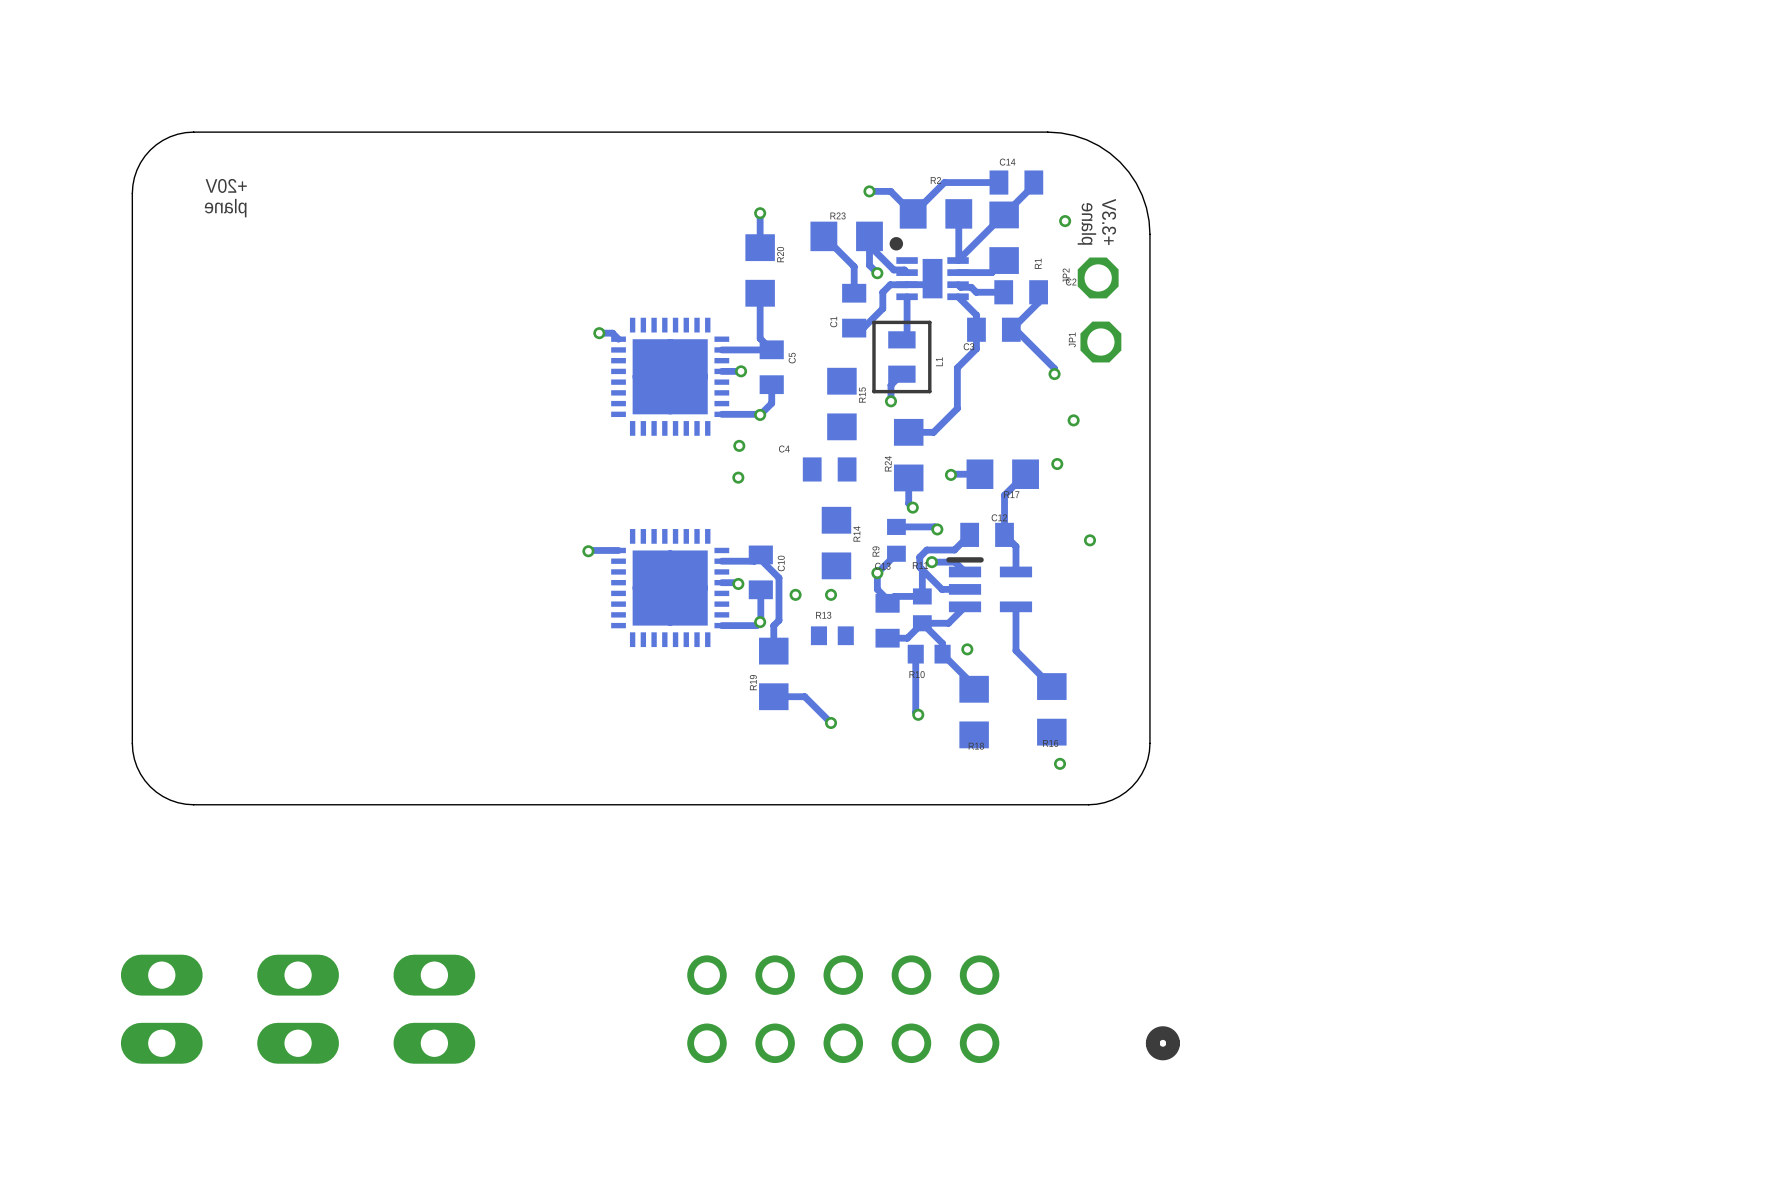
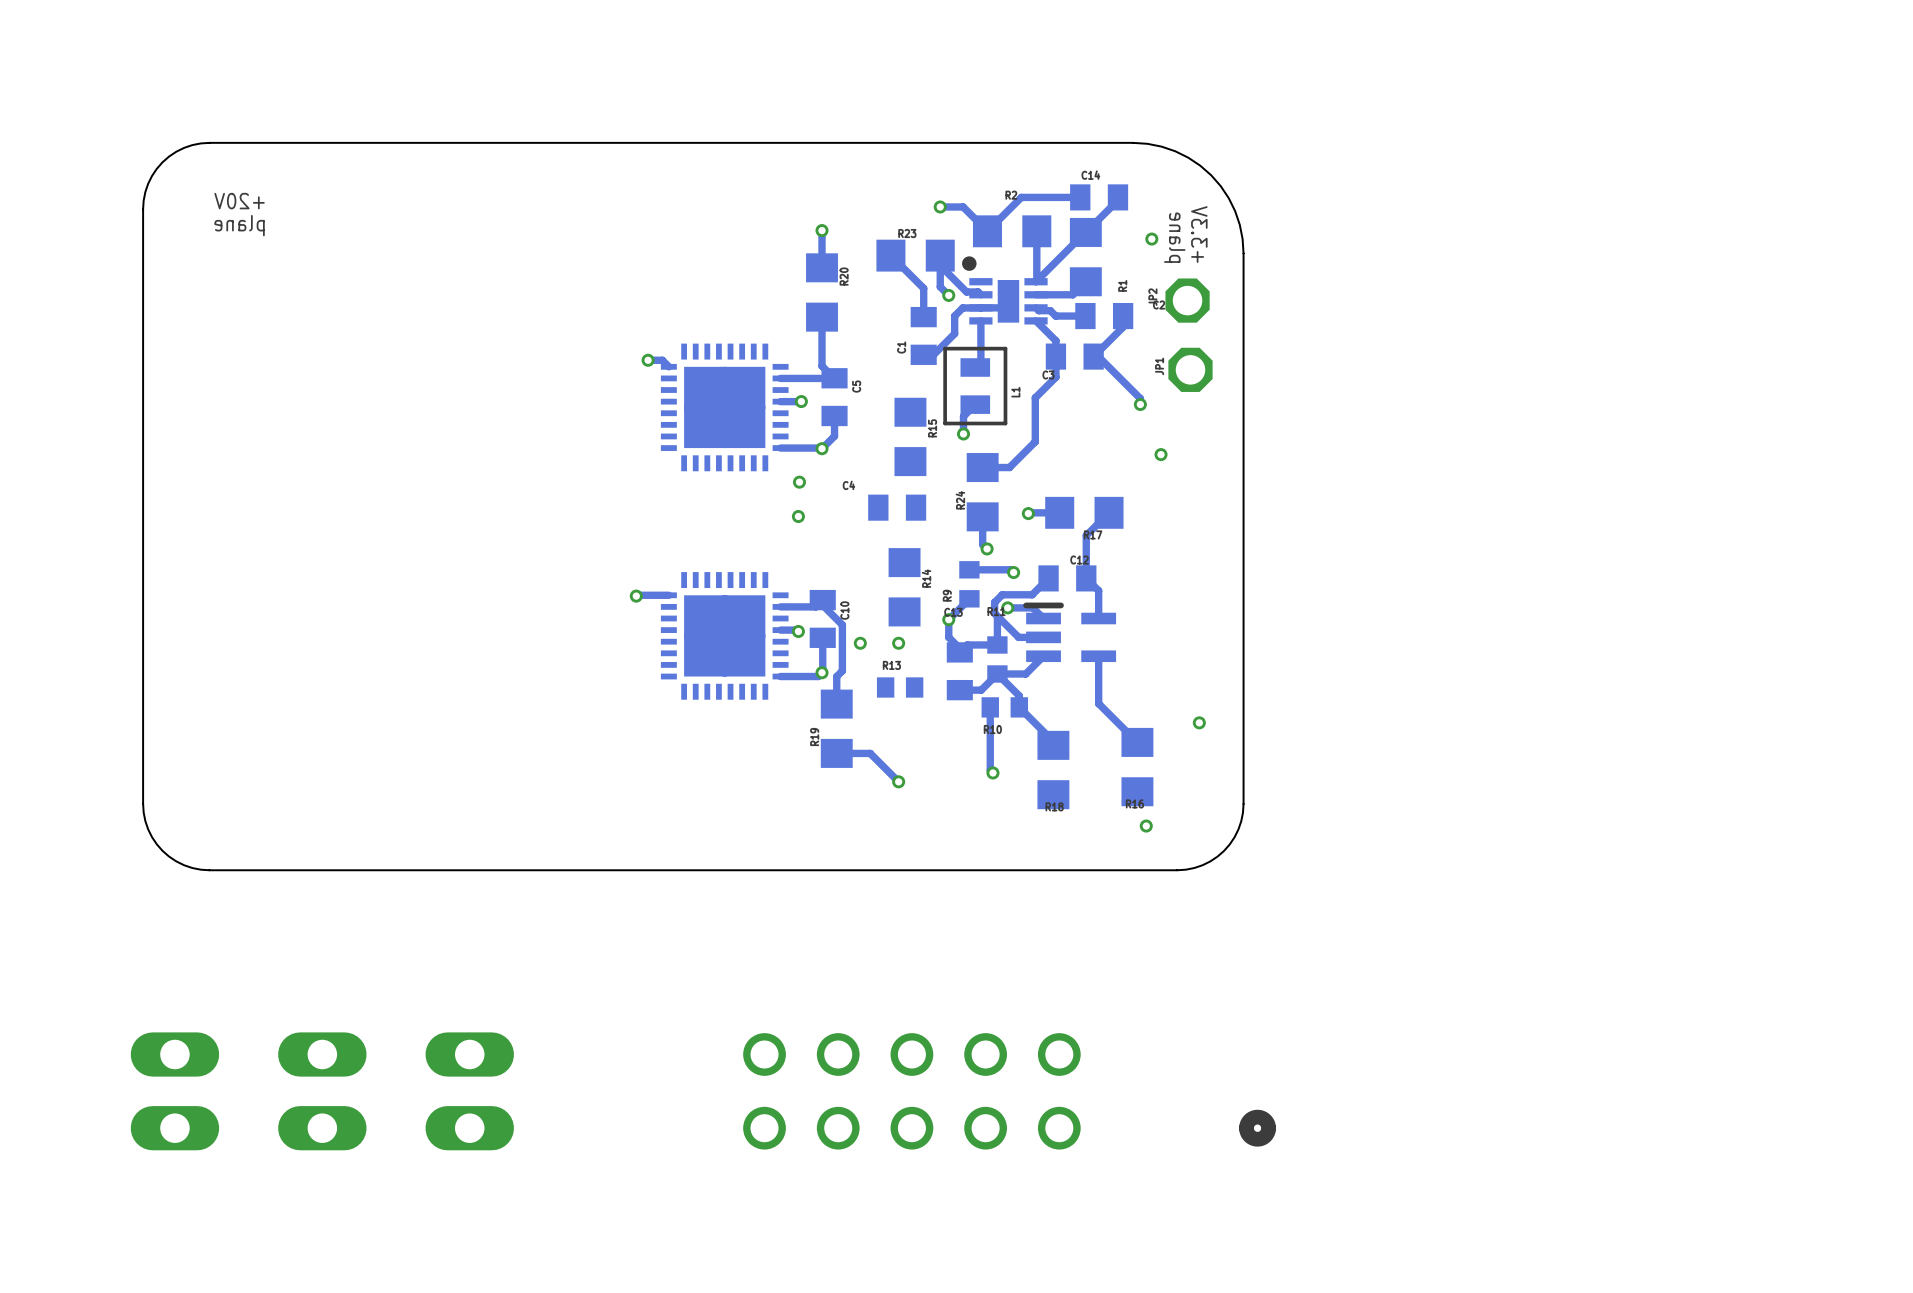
via: (1057, 464) -> none
via: (1089, 540) -> none
via: (967, 649) -> none
via: none -> (1199, 722)

